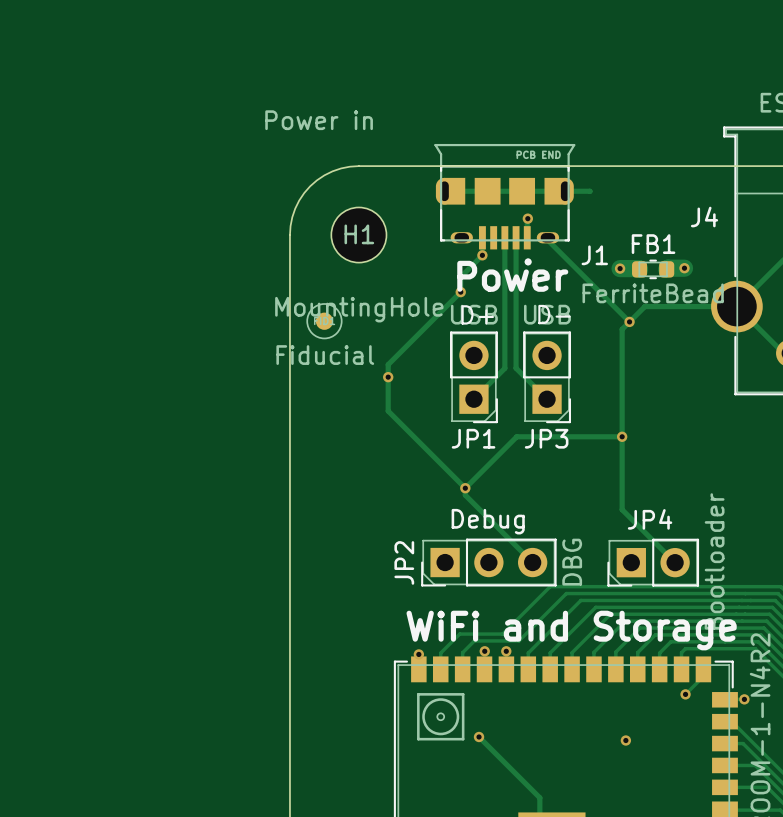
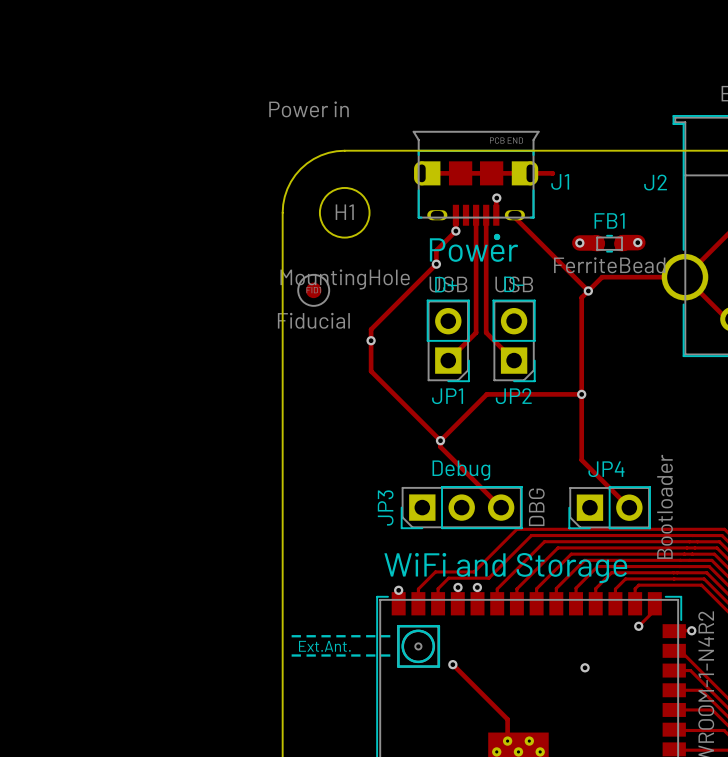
J4 name: J4 (704, 217) -> J2 (655, 182)
J1 name position: J1 (594, 255) -> J1 (560, 181)
JP3 name: JP3 (546, 438) -> JP2 (513, 396)
JP2 name: JP2 (404, 562) -> JP3 (385, 507)
line: none -> (398, 626) (438, 626) (438, 666) (398, 666) (398, 626)
drawing: none -> [401, 629, 435, 664]
line: none -> (290, 636) (390, 636)
text: none -> Ext.Ant. (324, 646)
line: none -> (290, 655) (390, 655)

